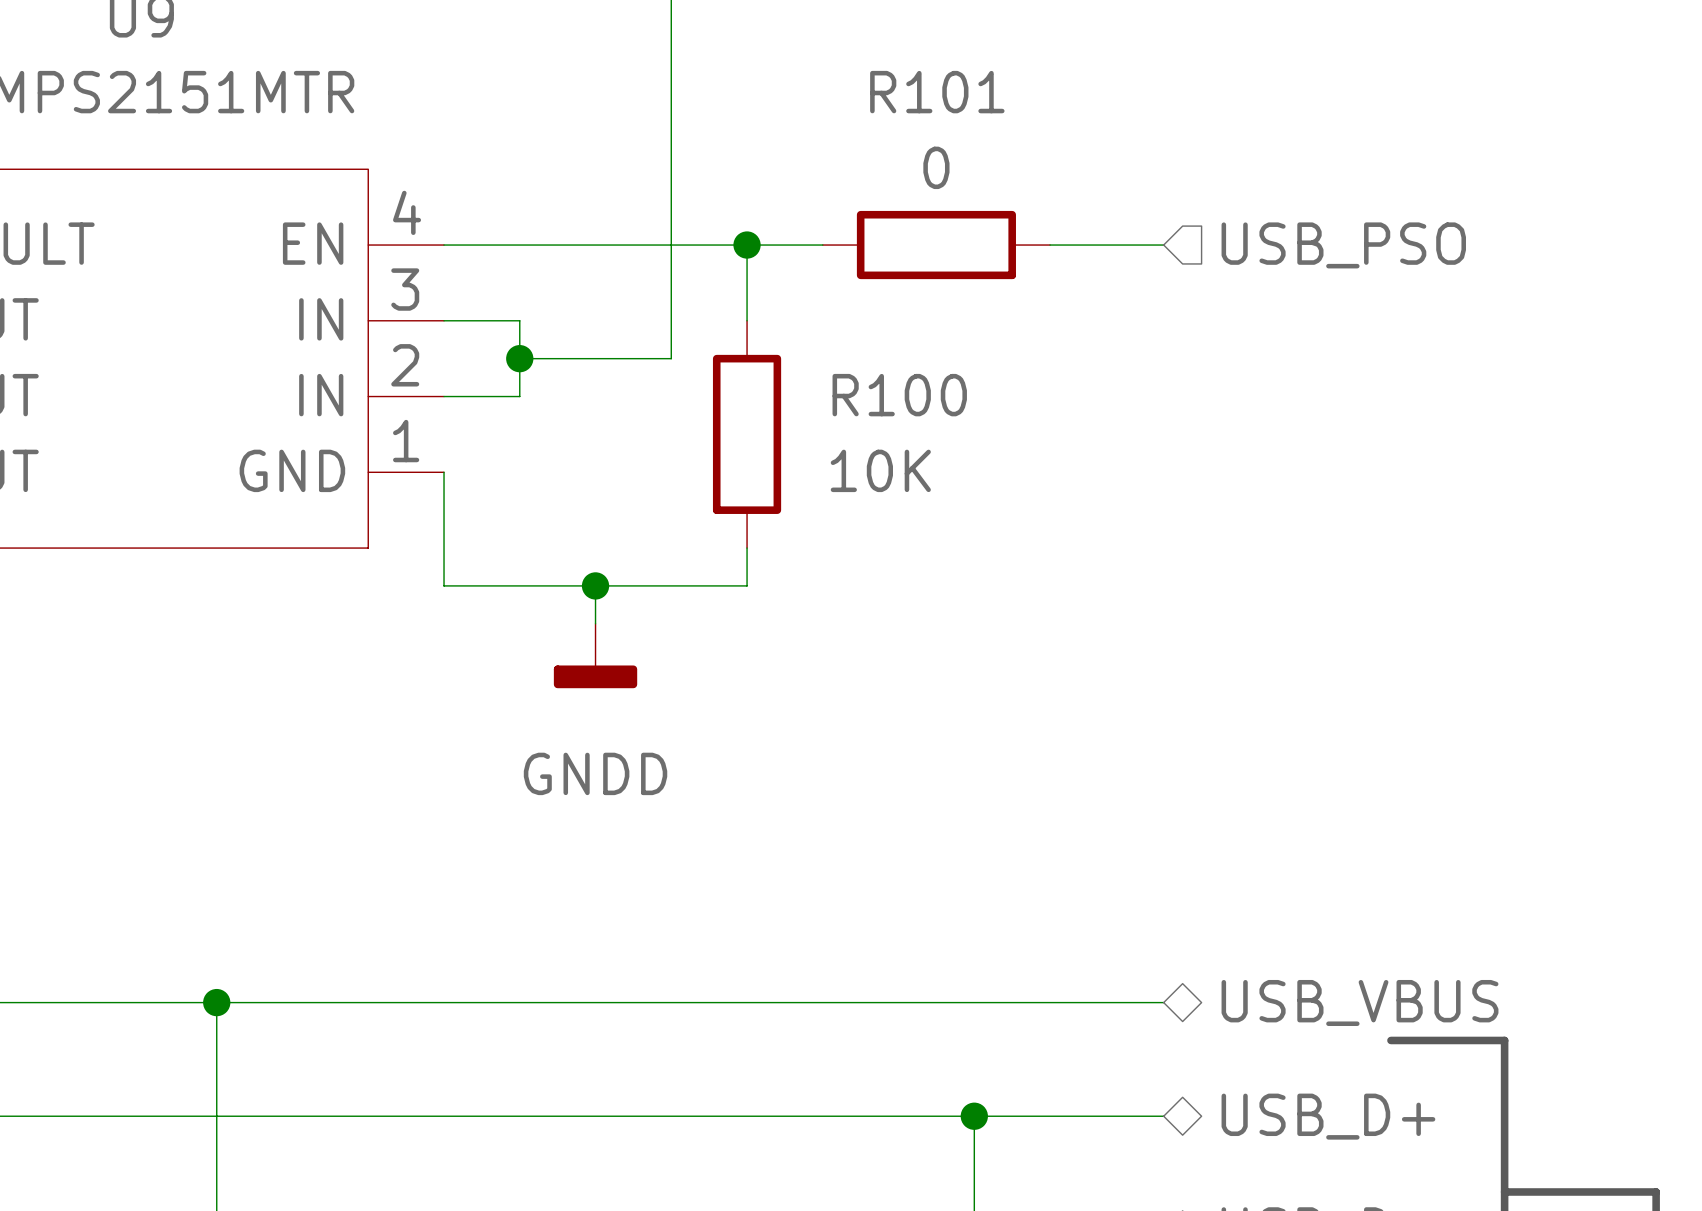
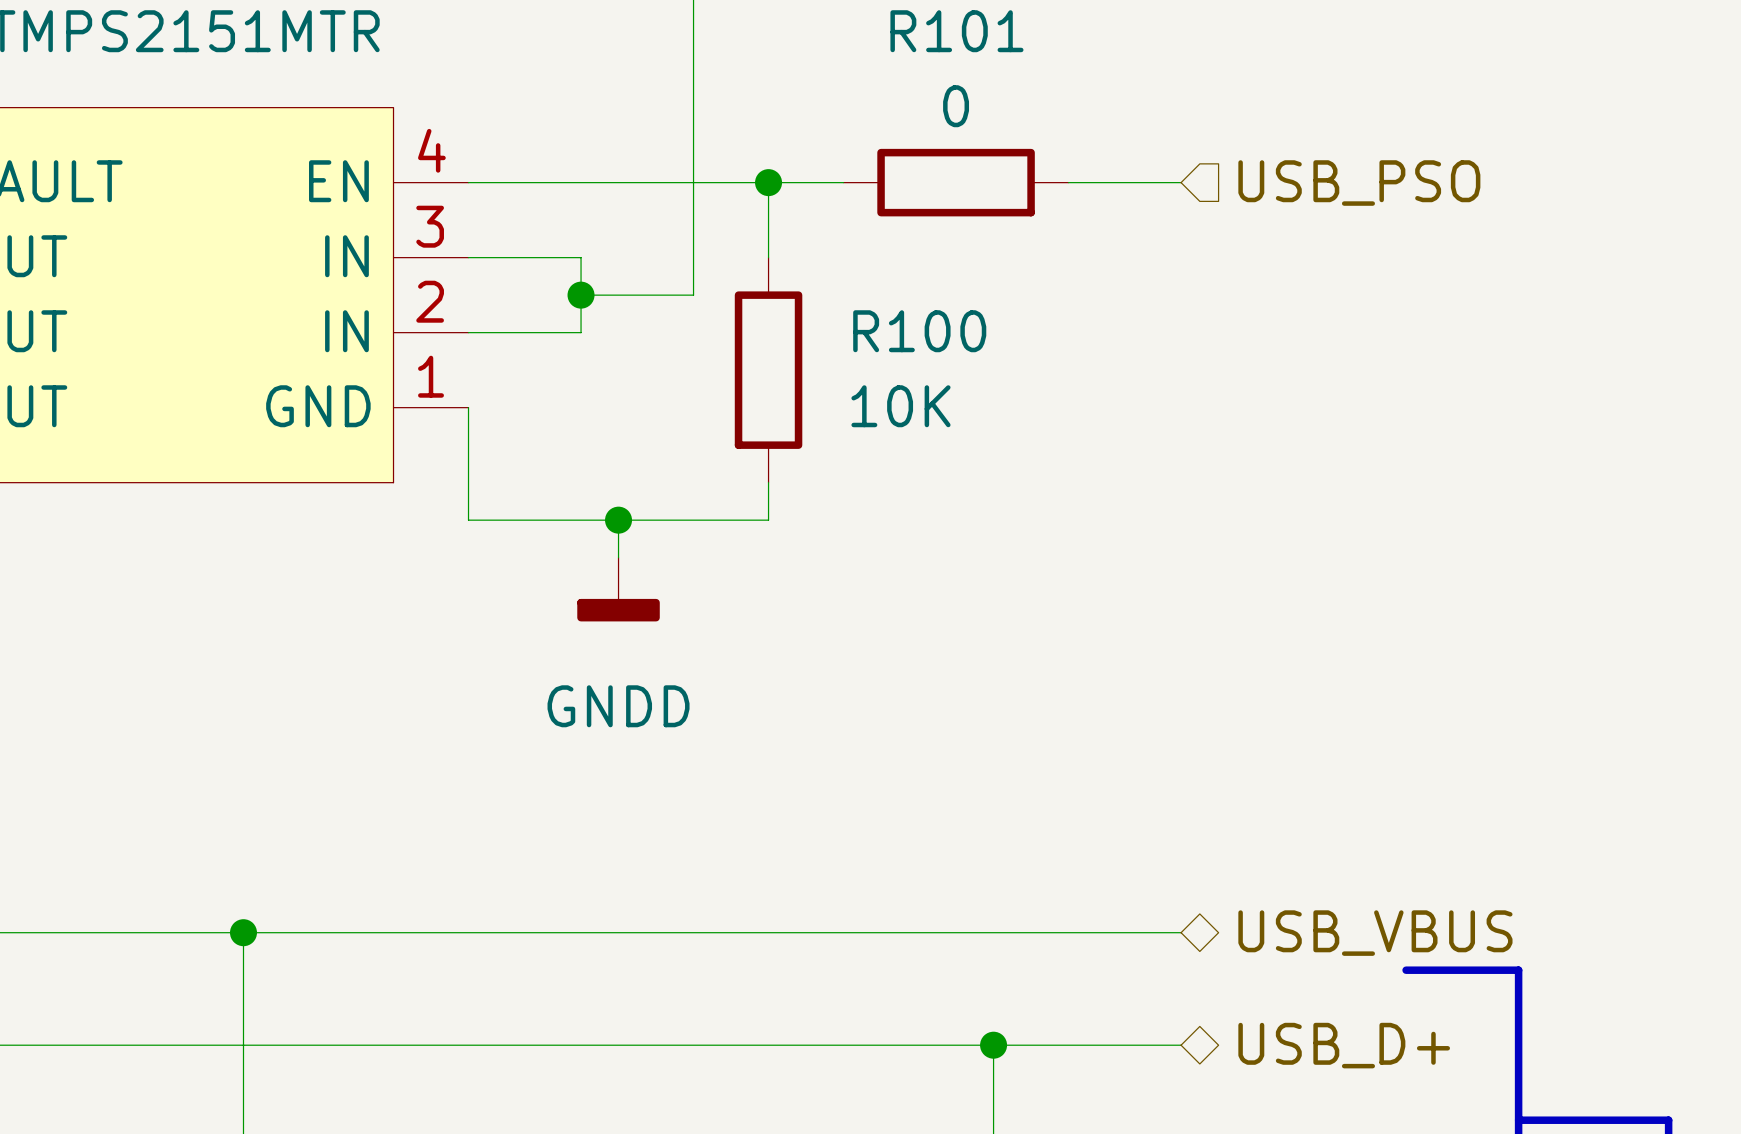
wire: (519, 320) (519, 396) -> (543, 257) (581, 257) (581, 332) (543, 332)
wire: (519, 358) (557, 358) -> none
junction position: (519, 358) -> (581, 295)

